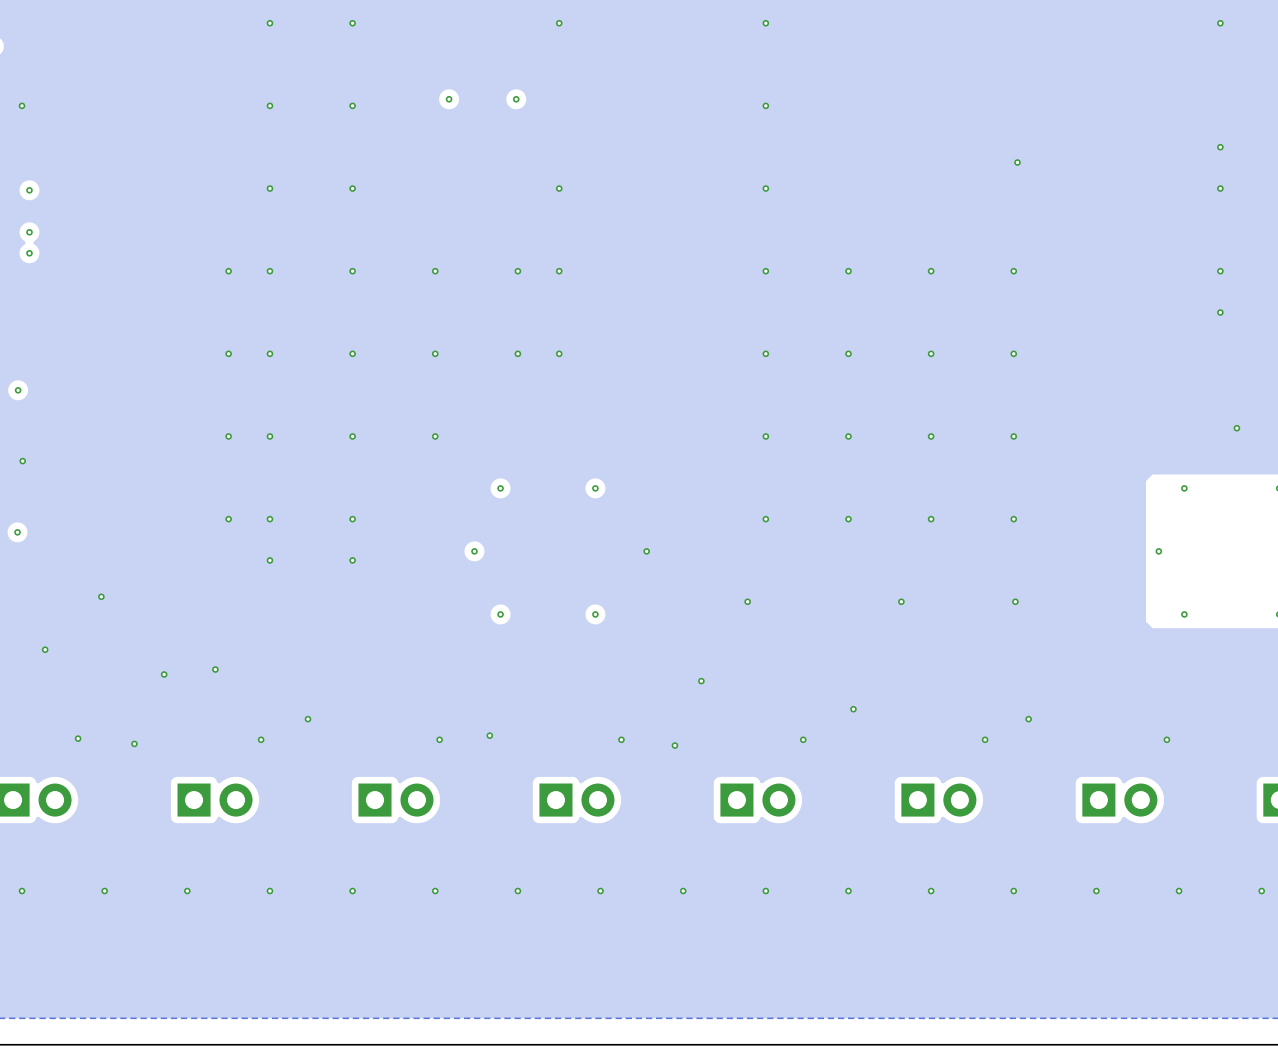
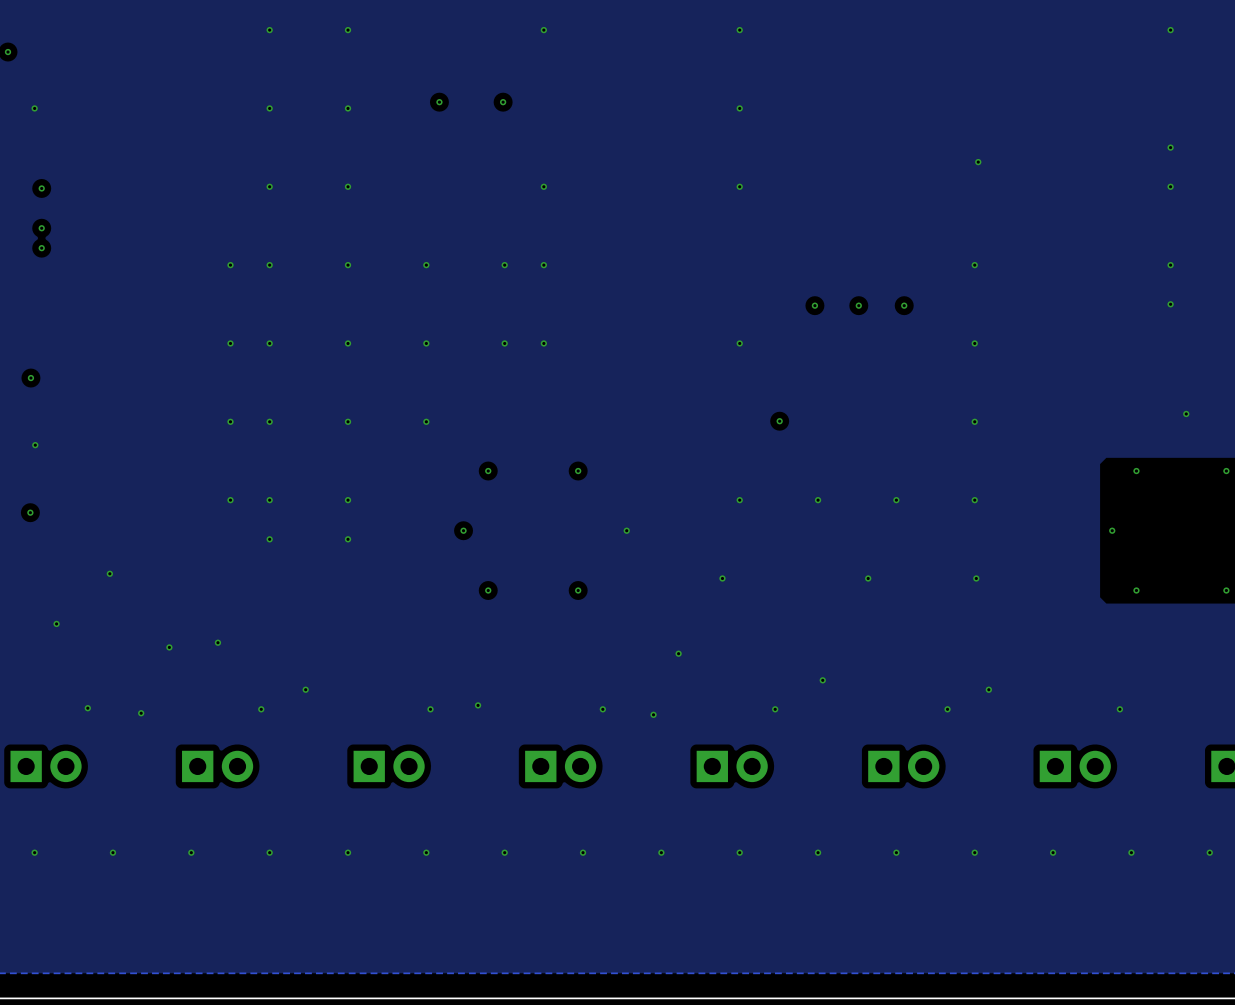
via: (765, 271) -> none
via: (848, 271) -> none
via: (931, 271) -> none
via: none -> (814, 305)
via: none -> (858, 305)
via: none -> (904, 305)
via: (848, 353) -> none
via: (931, 353) -> none
via: none -> (779, 421)
via: (765, 436) -> none
via: (848, 436) -> none
via: (931, 436) -> none

